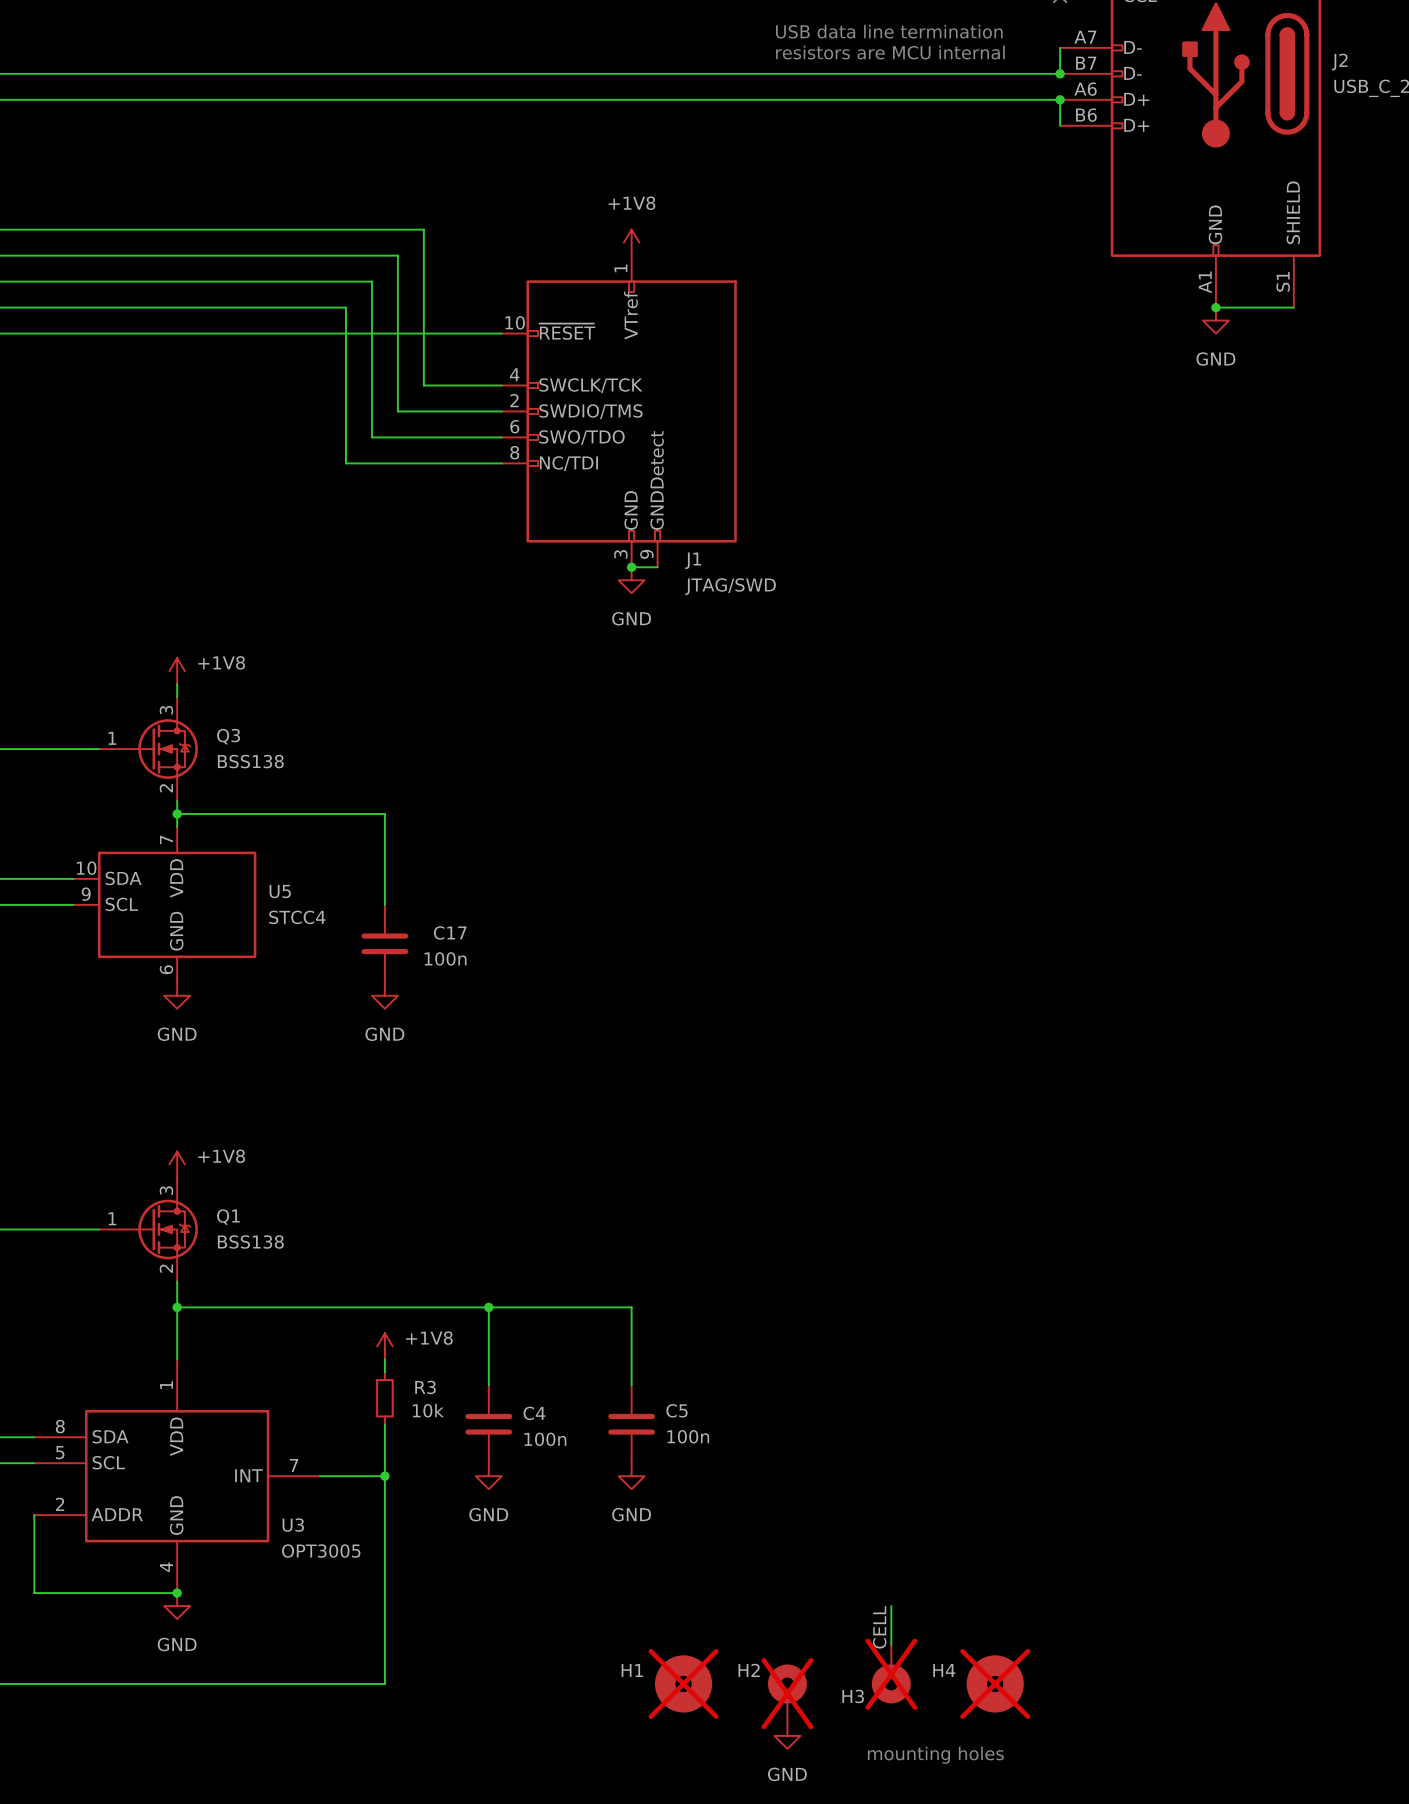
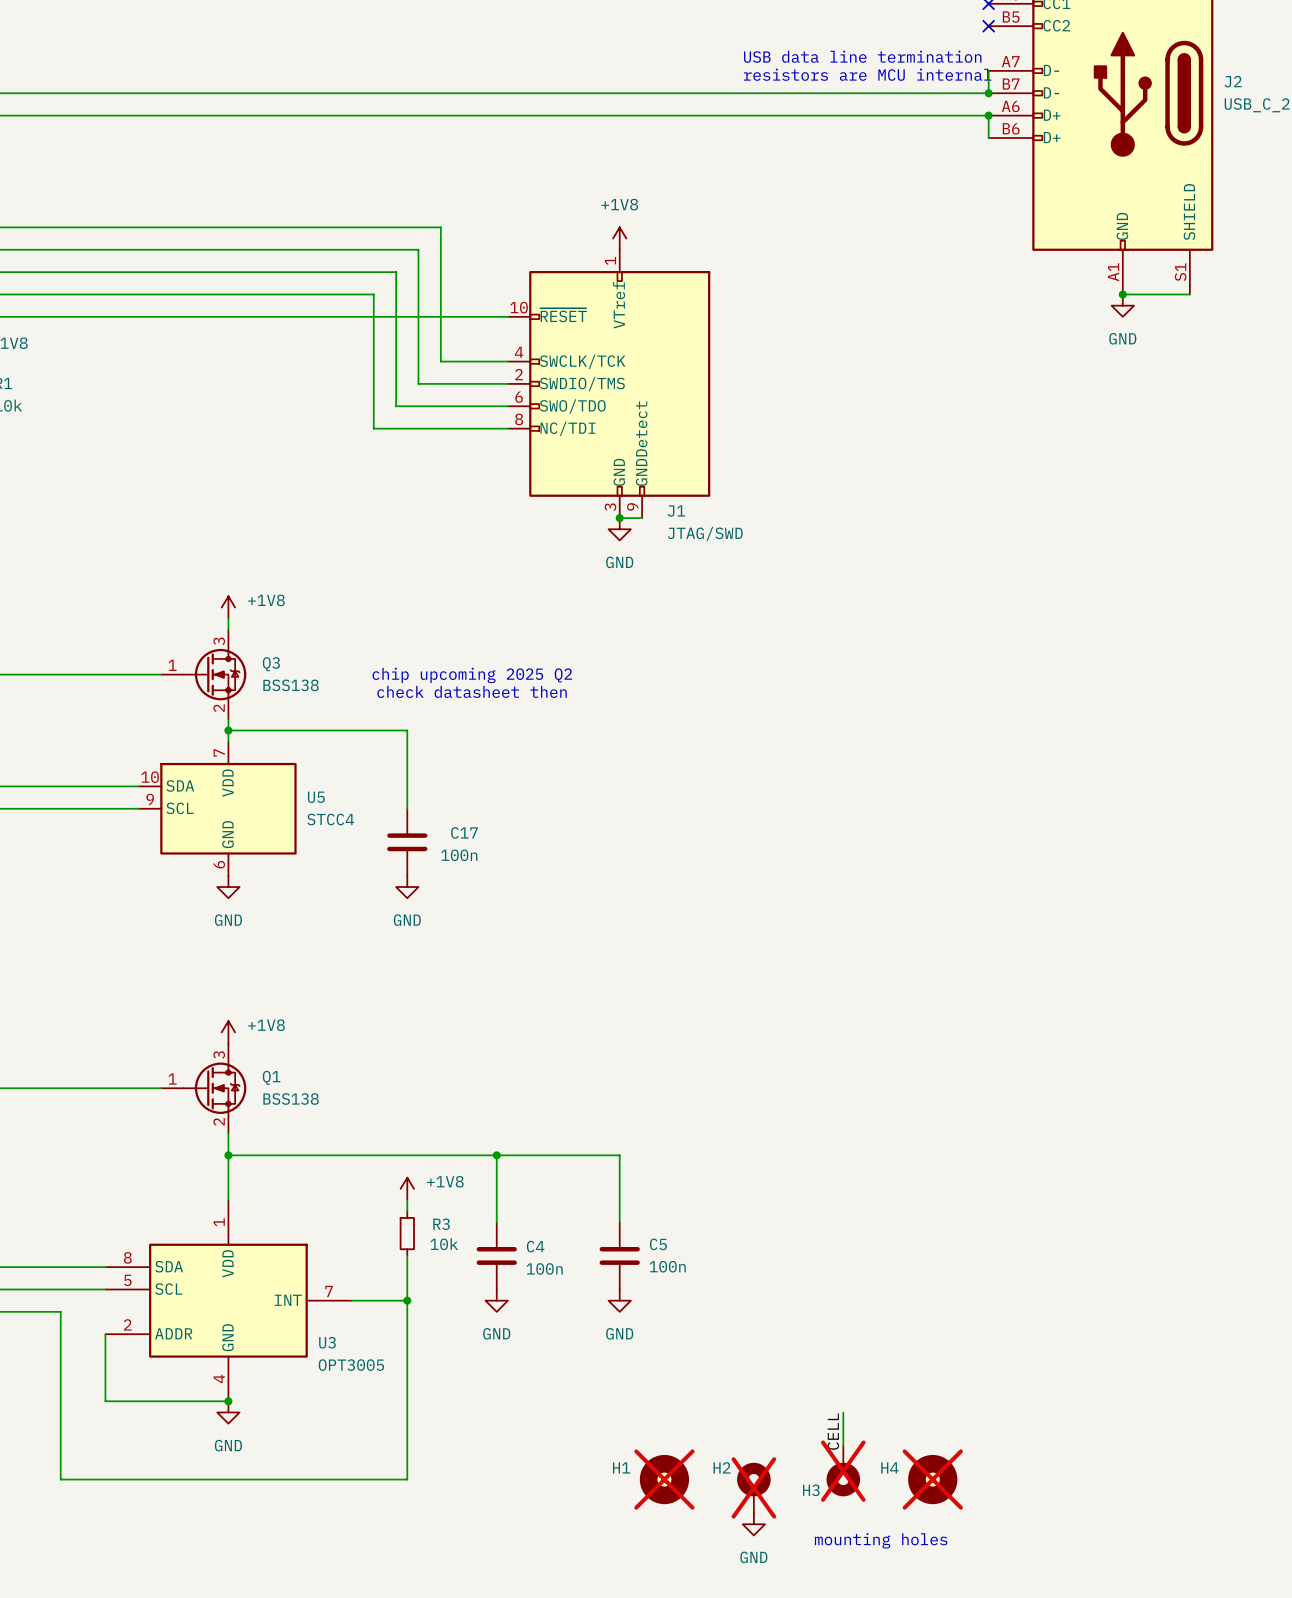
text: none -> chip upcoming 2025 Q2 (472, 675)
text: none -> check datasheet then (472, 691)

